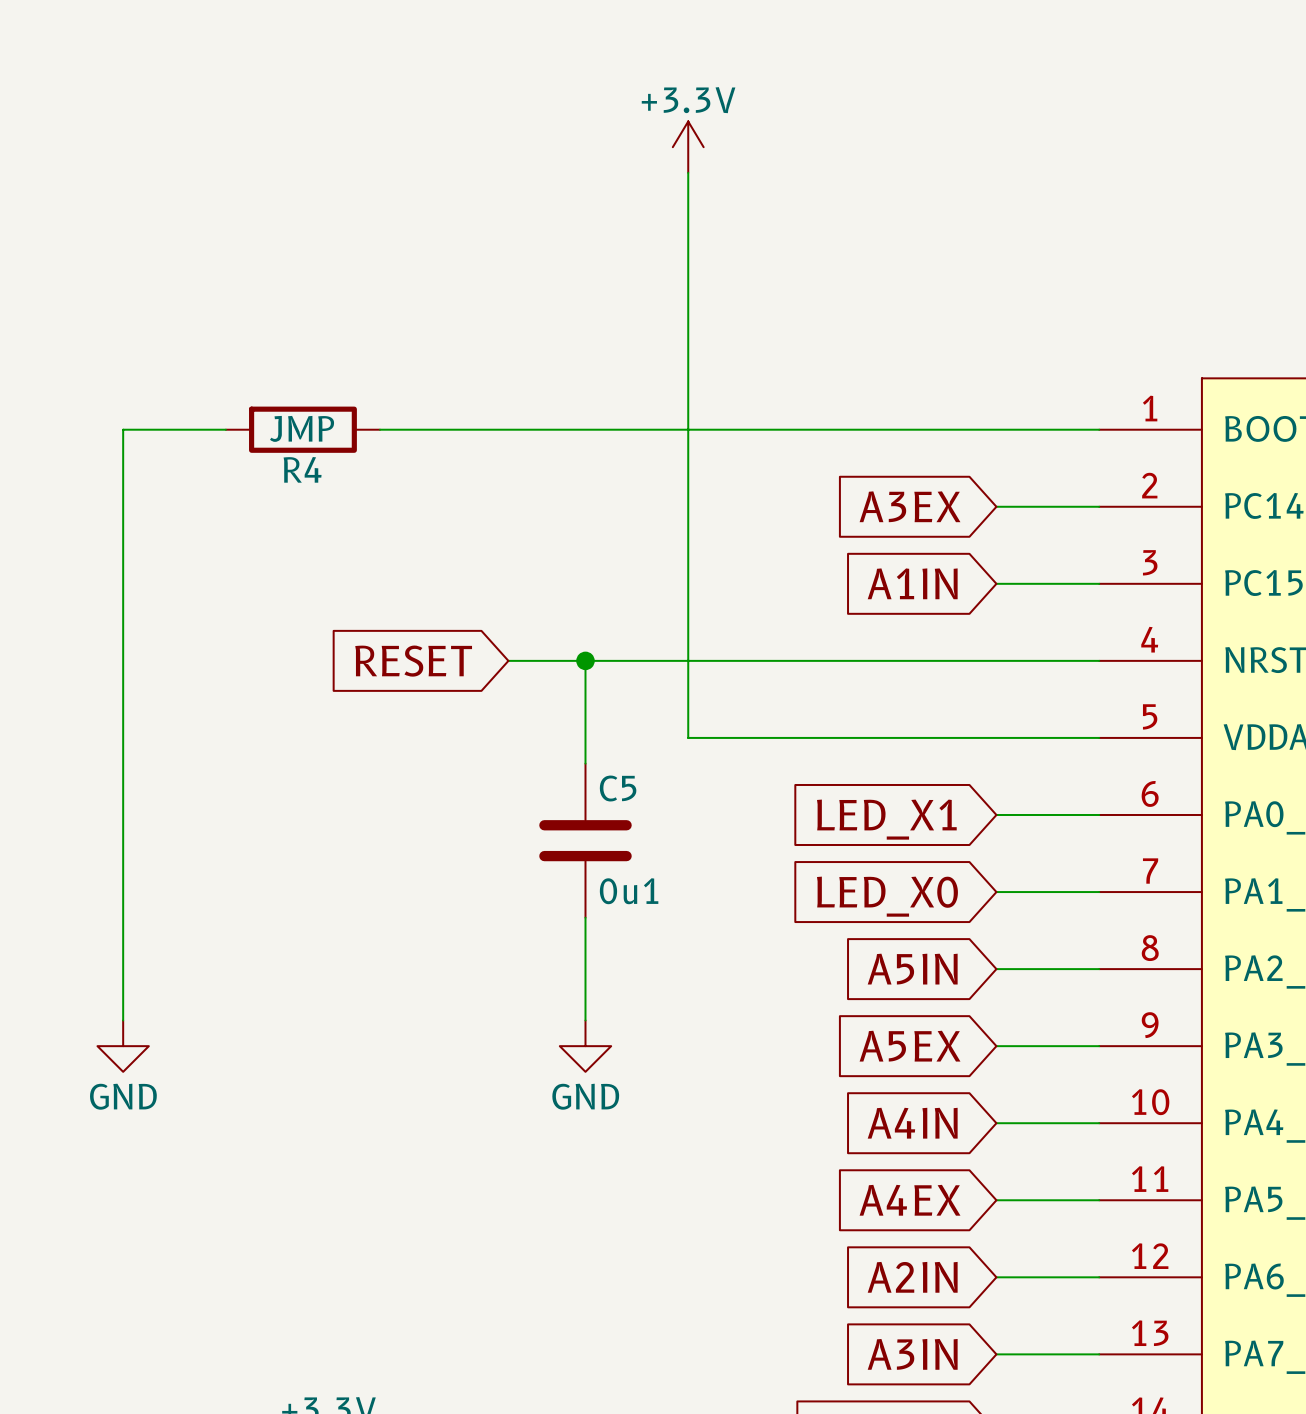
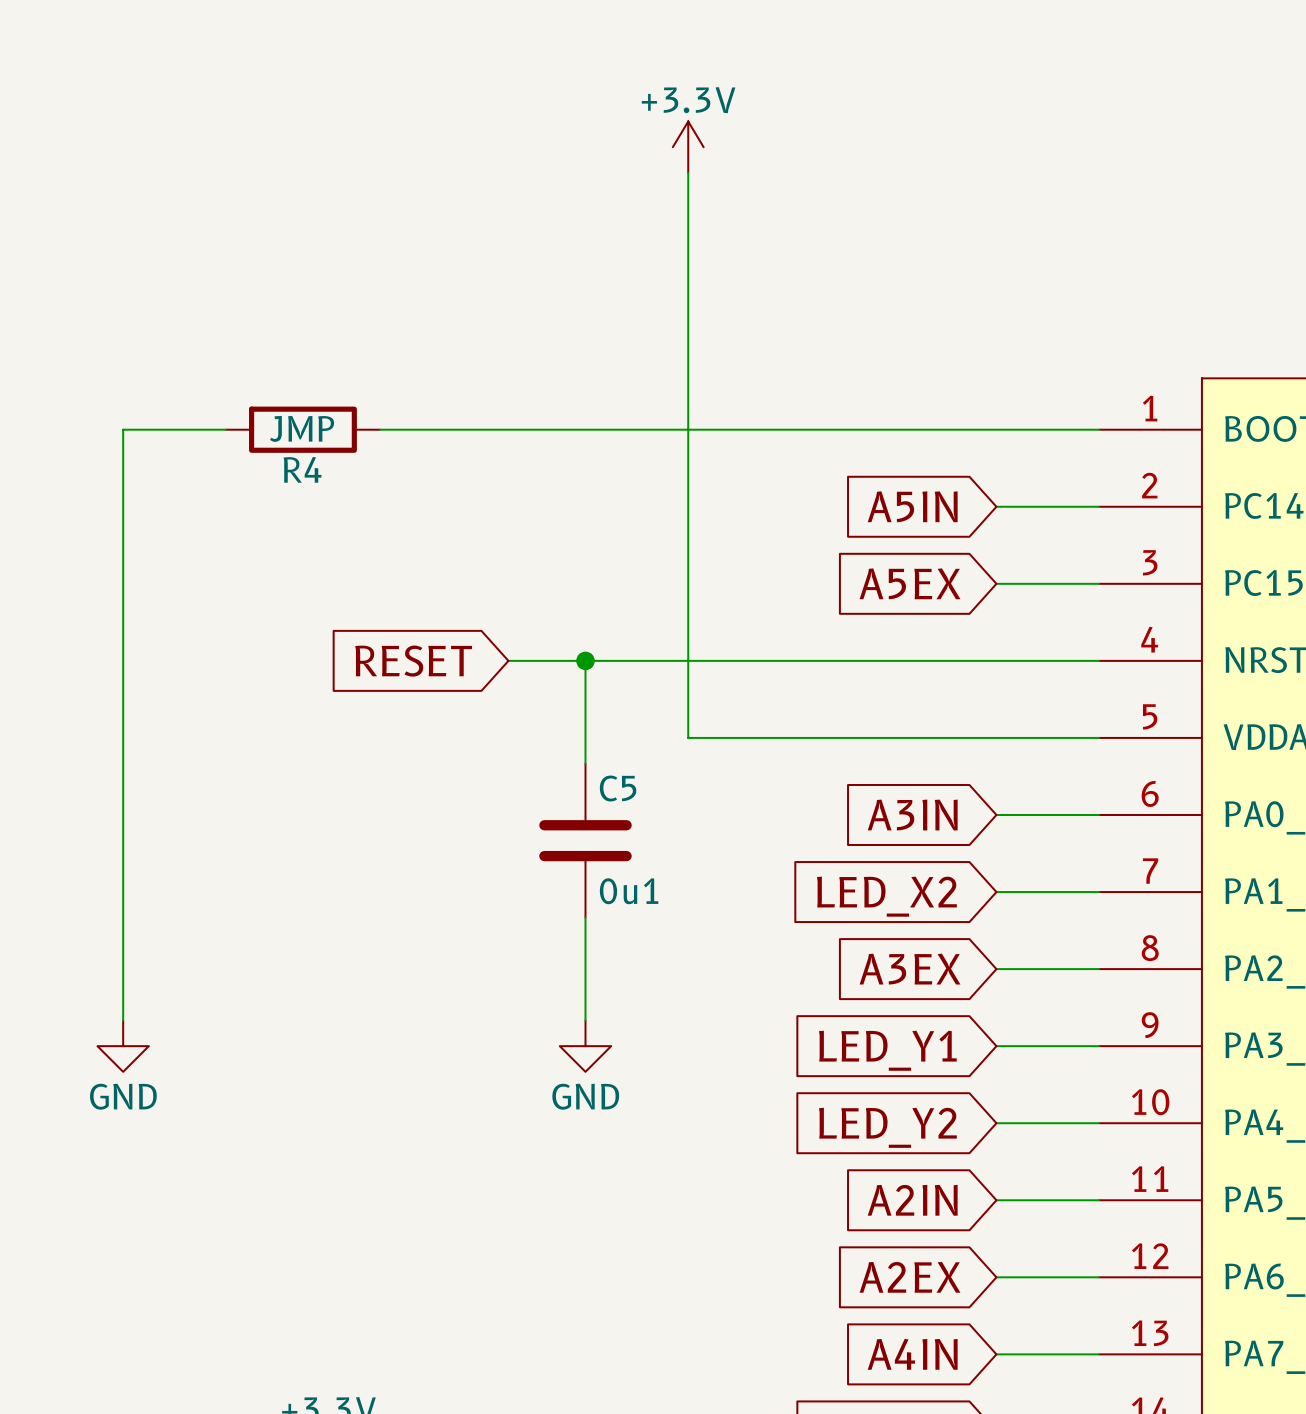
global label: A3EX (910, 506) -> A5IN (912, 506)
global label: A1IN (912, 583) -> A5EX (910, 583)
global label: LED_X1 (886, 819) -> A3IN (912, 814)
global label: LED_X0 (887, 896) -> LED_X2 (886, 896)
global label: A5IN (912, 969) -> A3EX (910, 969)
global label: A5EX (910, 1046) -> LED_Y1 (887, 1050)
global label: A4IN (912, 1123) -> LED_Y2 (887, 1127)
global label: A4EX (910, 1200) -> A2IN (912, 1200)
global label: A2IN (912, 1277) -> A2EX (910, 1277)
global label: A3IN (912, 1354) -> A4IN (912, 1354)

